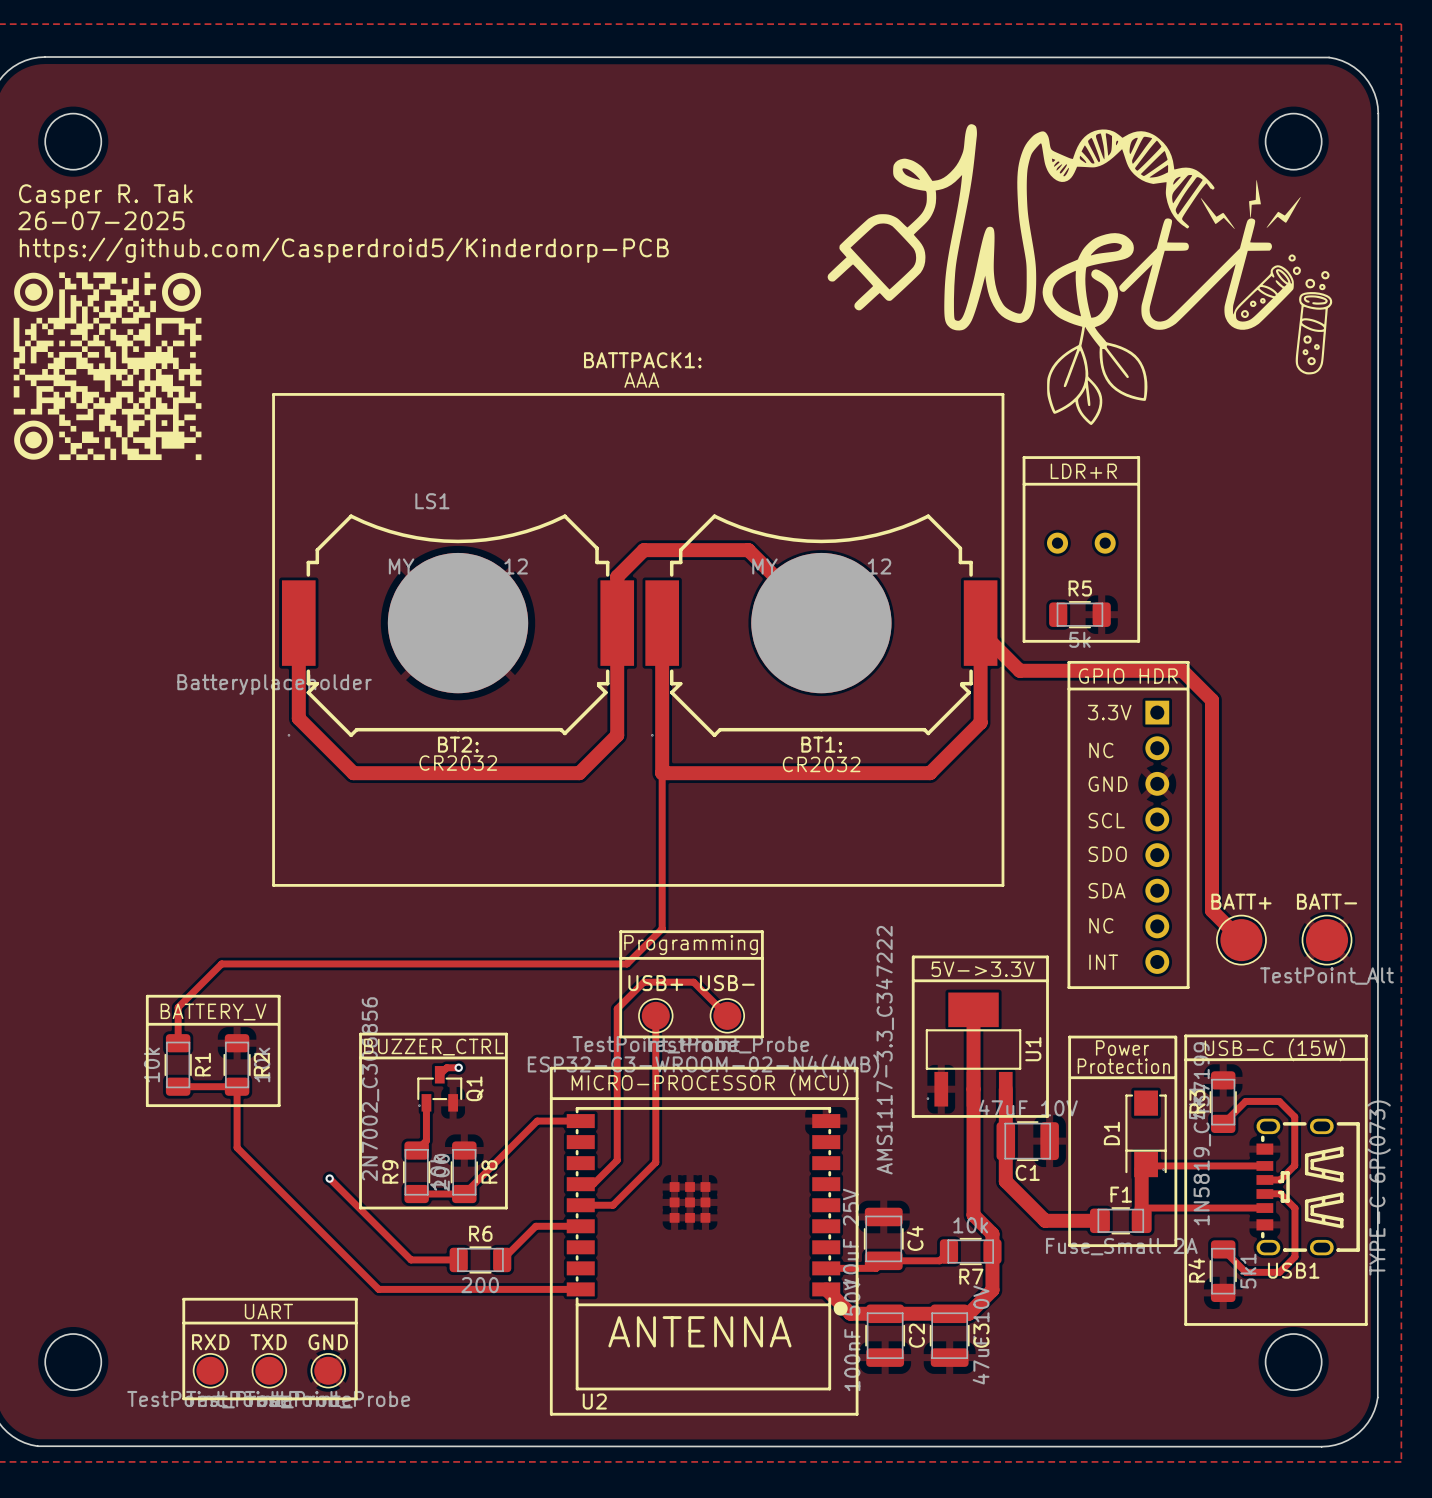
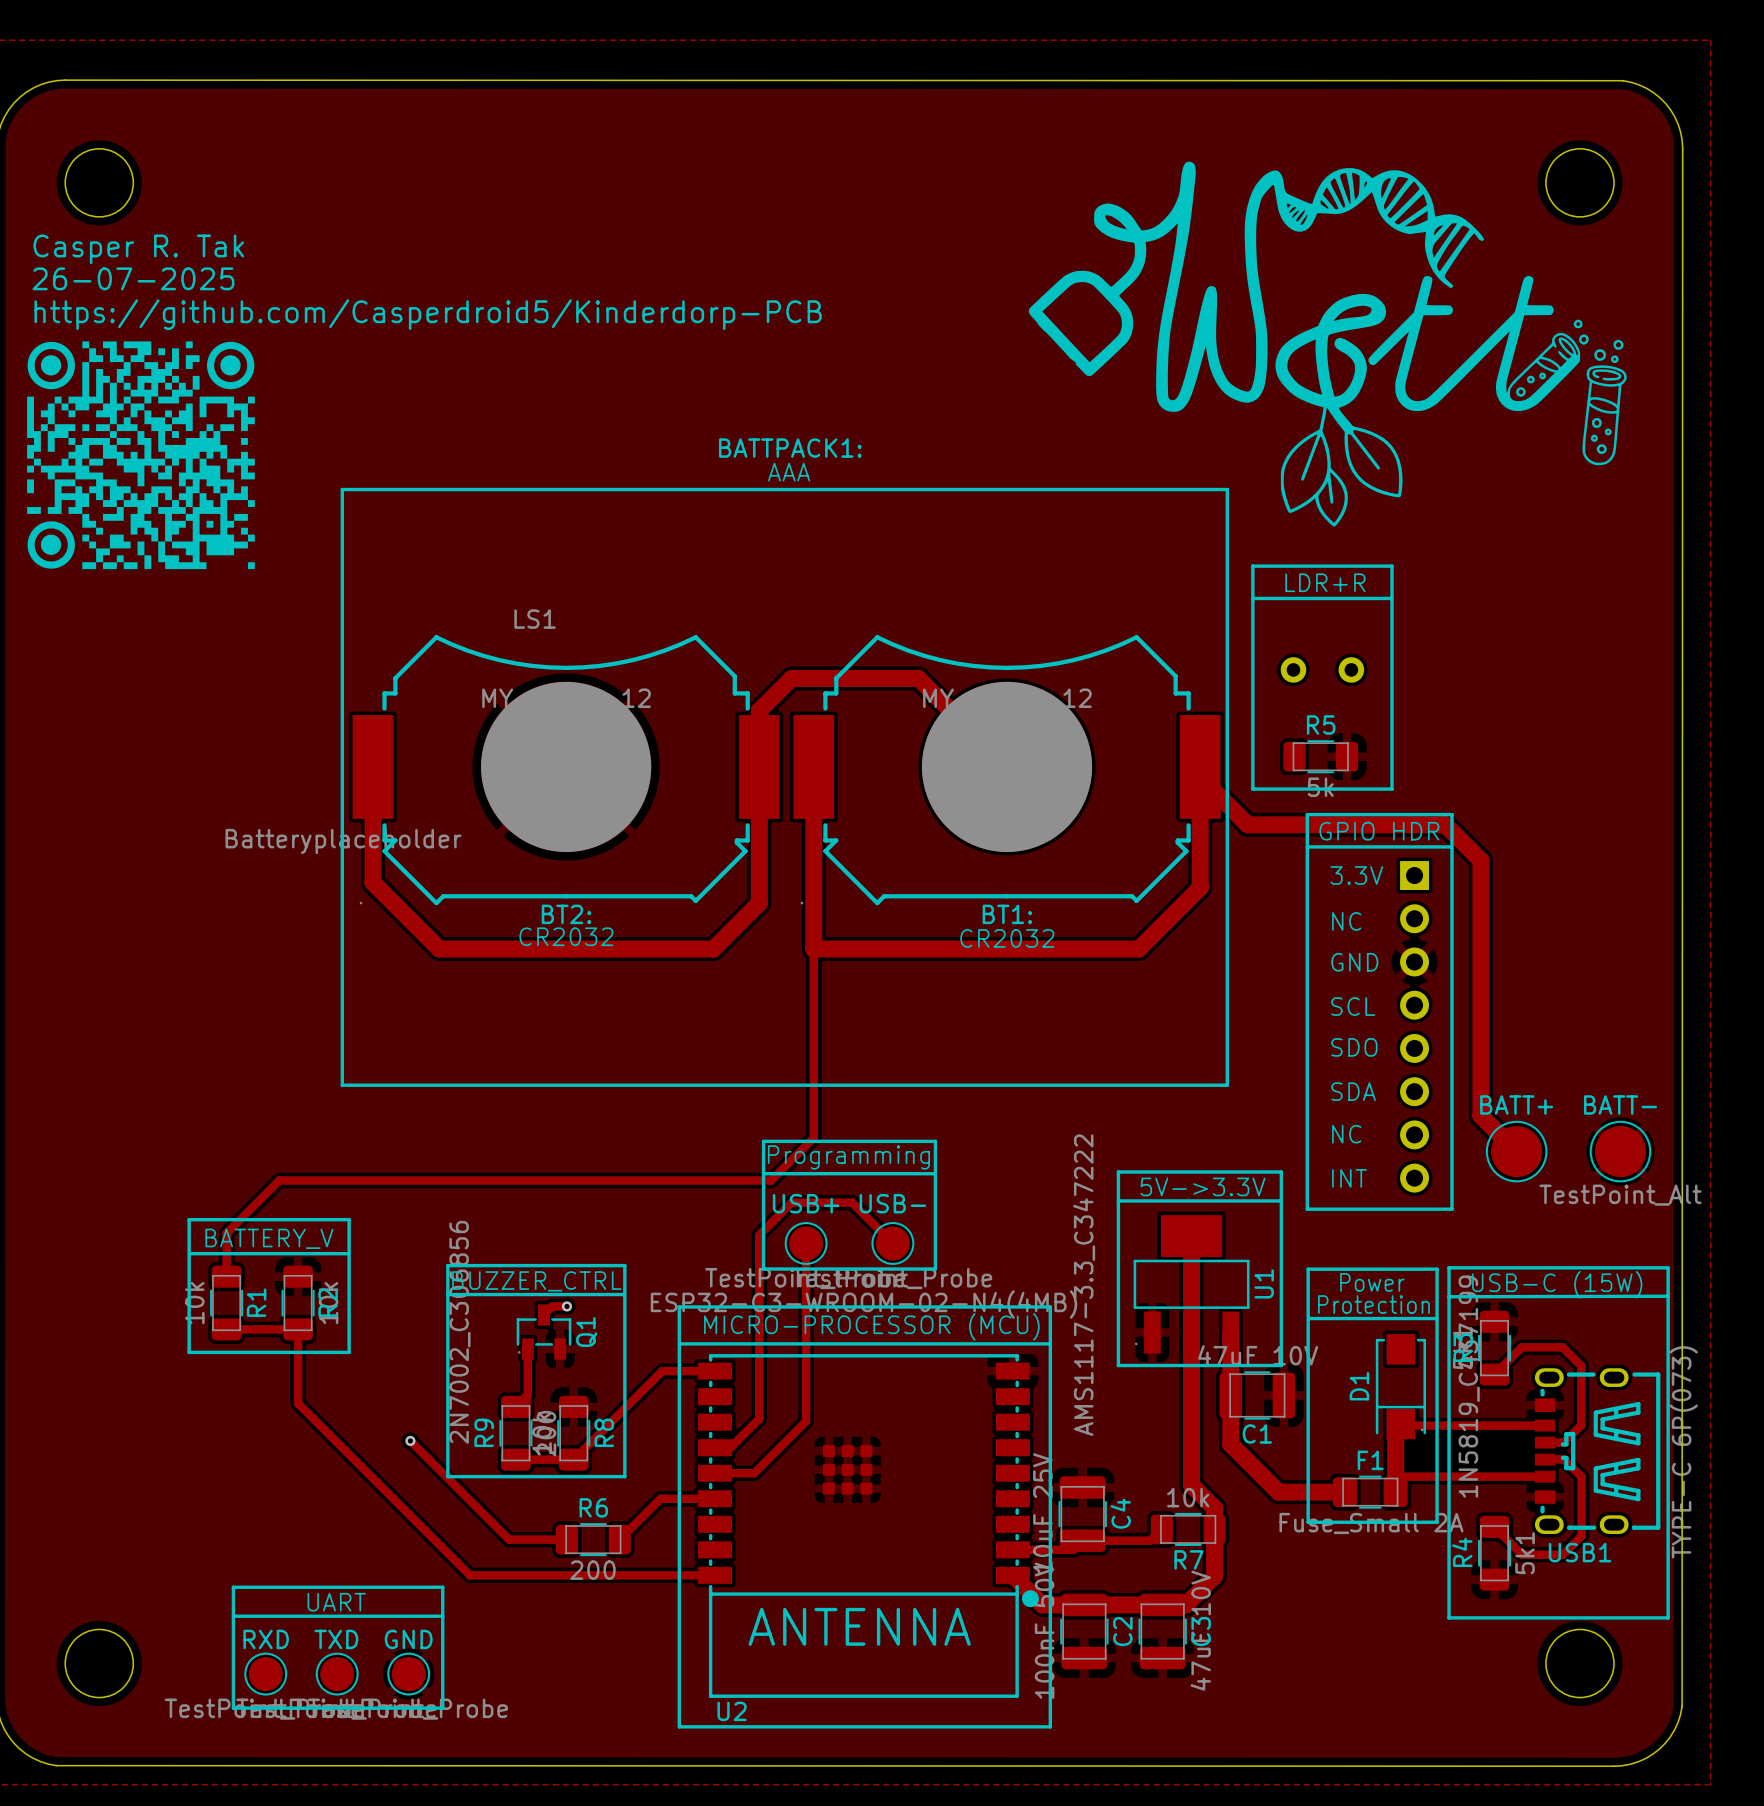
drawing shape: [827, 124, 1333, 426] -> [1028, 161, 1627, 527]

